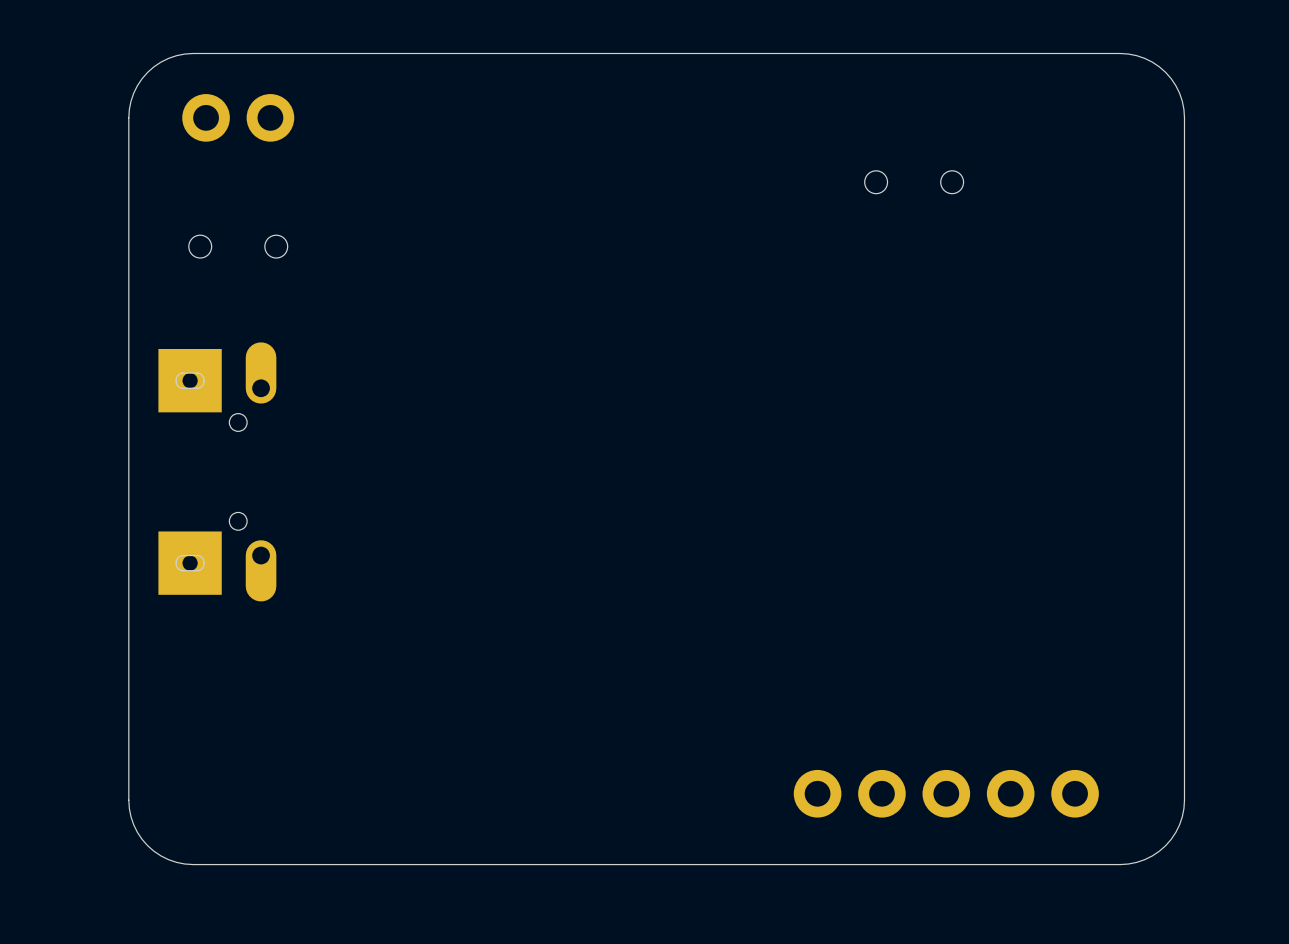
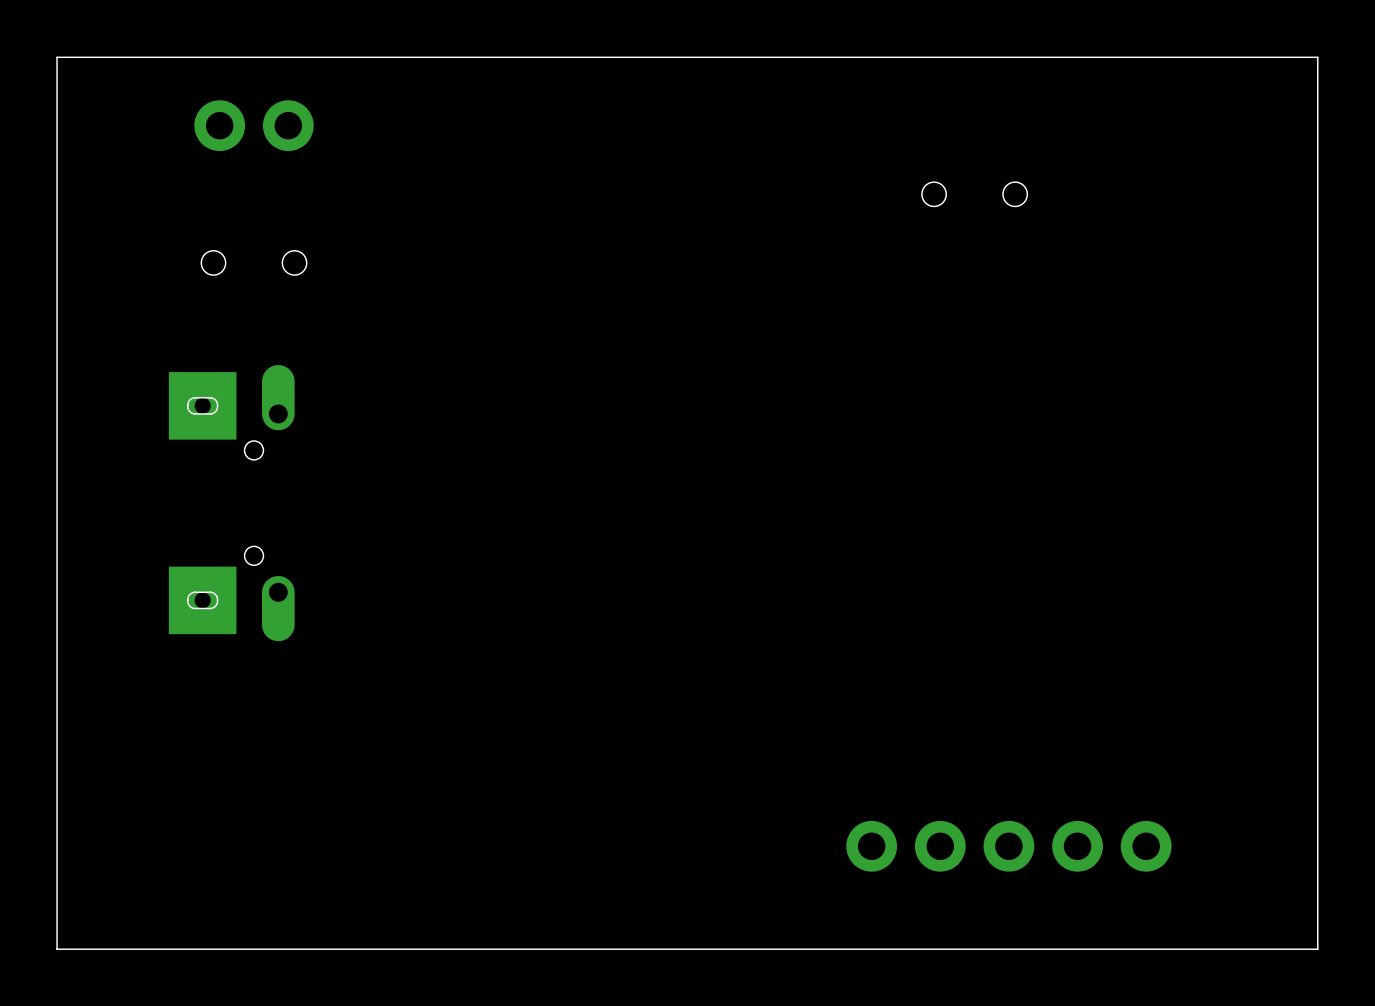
board edge: (1120, 53) (193, 53) (176, 55) (154, 66) (142, 78) (133, 93) (128, 117) (128, 800) (131, 816) (142, 839) (154, 851) (168, 859) (193, 864) (1120, 864) (1136, 862) (1159, 851) (1171, 839) (1179, 824) (1184, 800) (1184, 117) (1179, 93) (1165, 72) (1144, 58) (1120, 53) -> (1317, 57) (1317, 949) (57, 949) (57, 57) (1317, 57)

